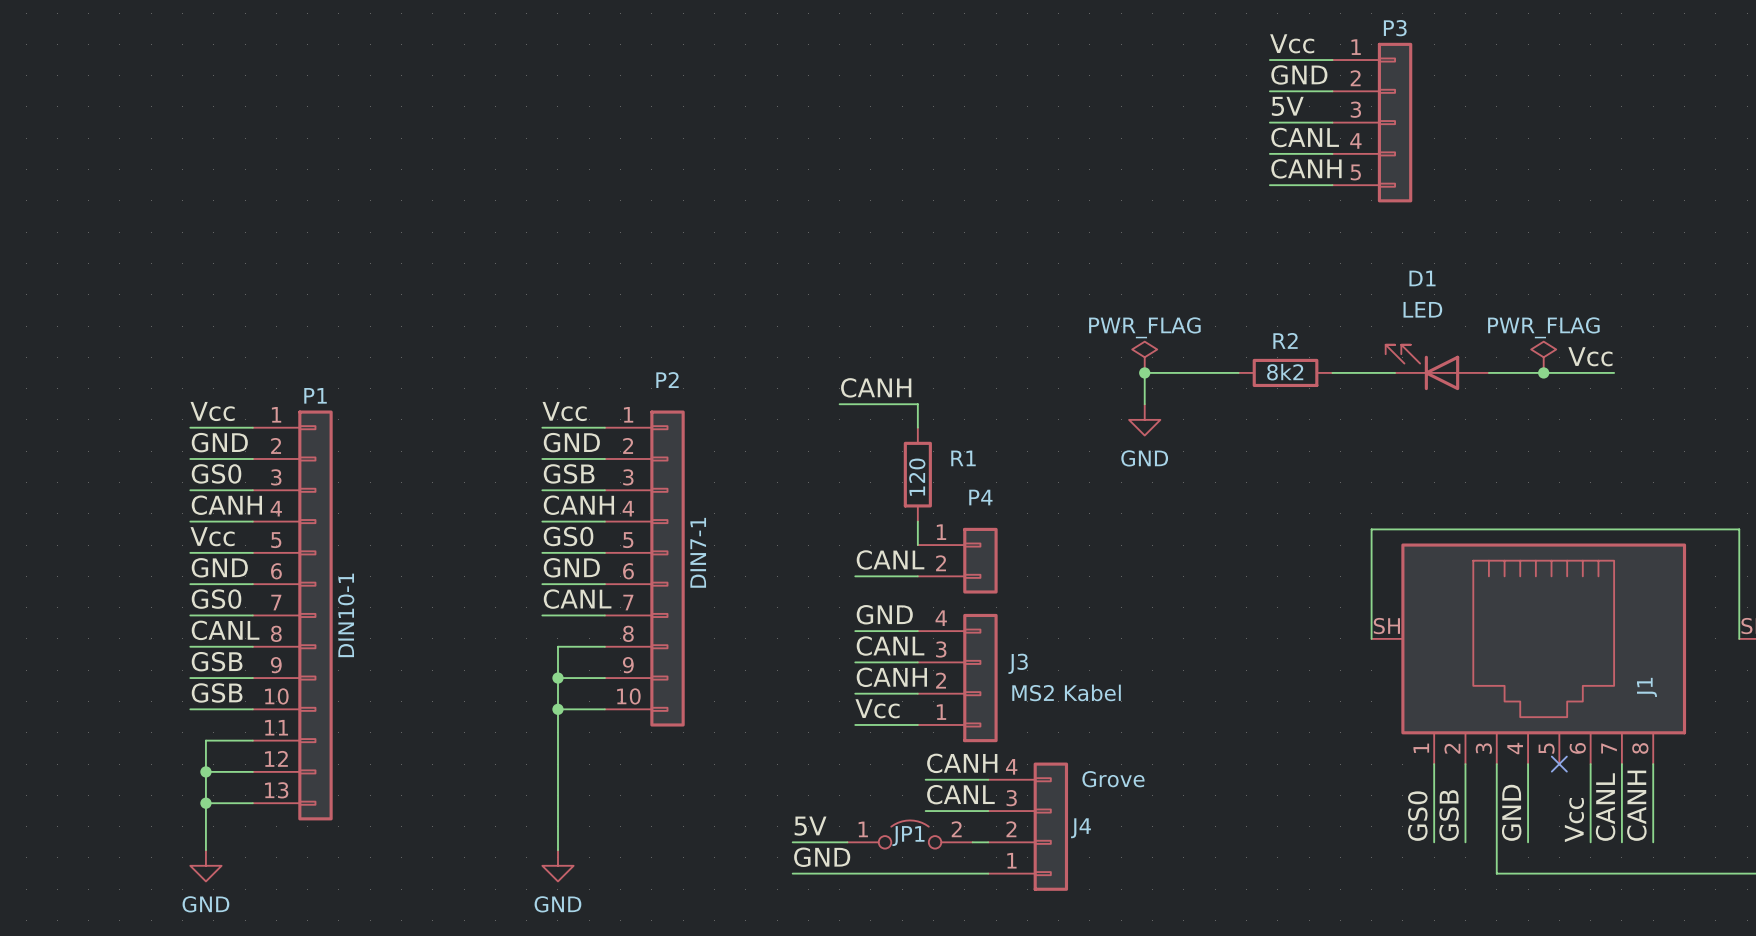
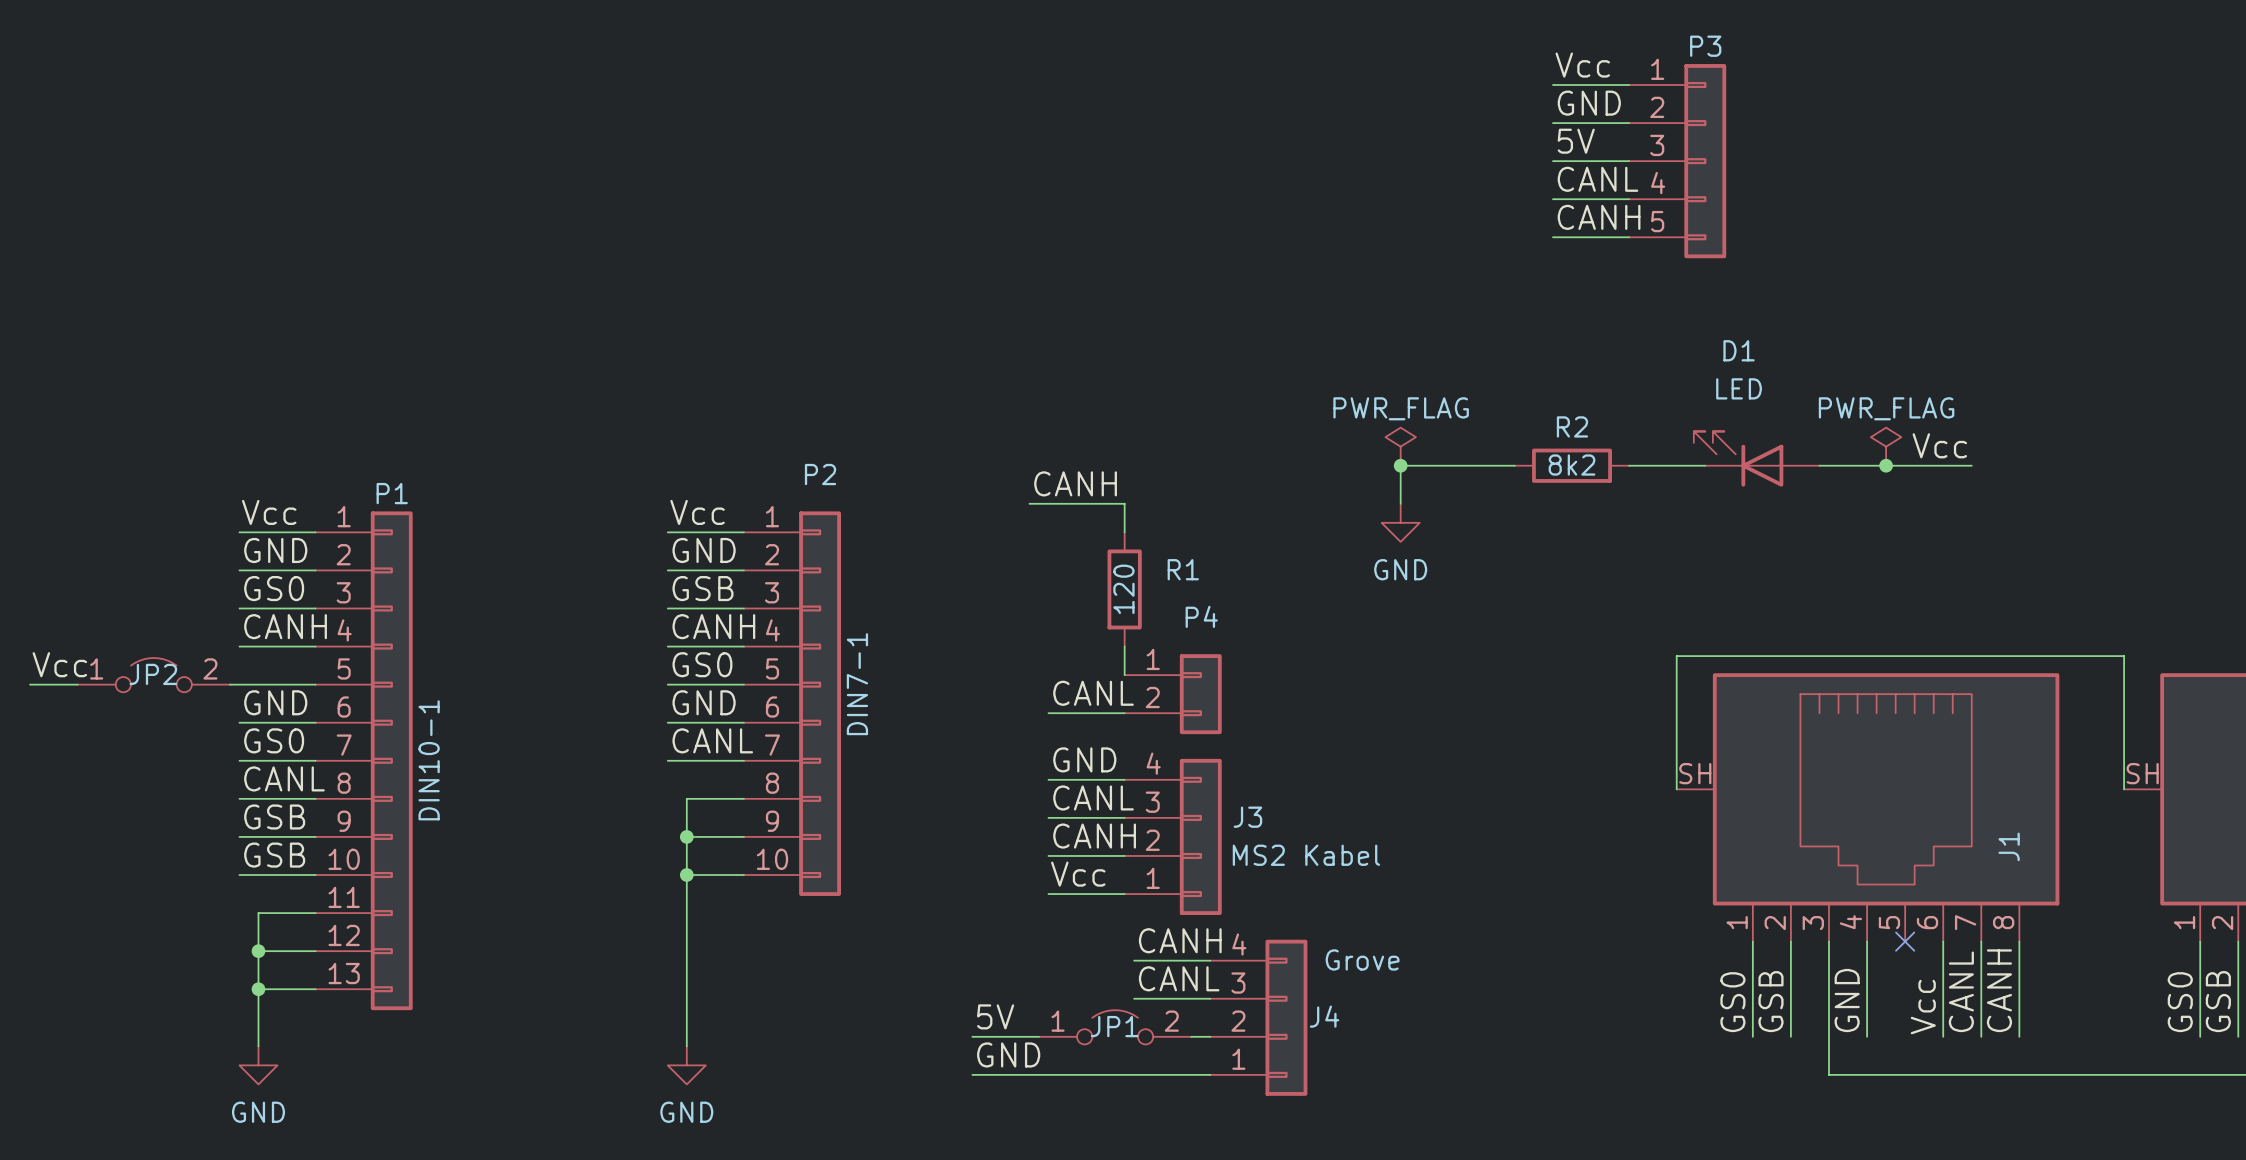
label position: Vcc (212, 536) -> Vcc (59, 664)
JP2: none -> (153, 675)
wire: none -> (30, 684) (77, 684)
wire: none -> (229, 684) (239, 684)

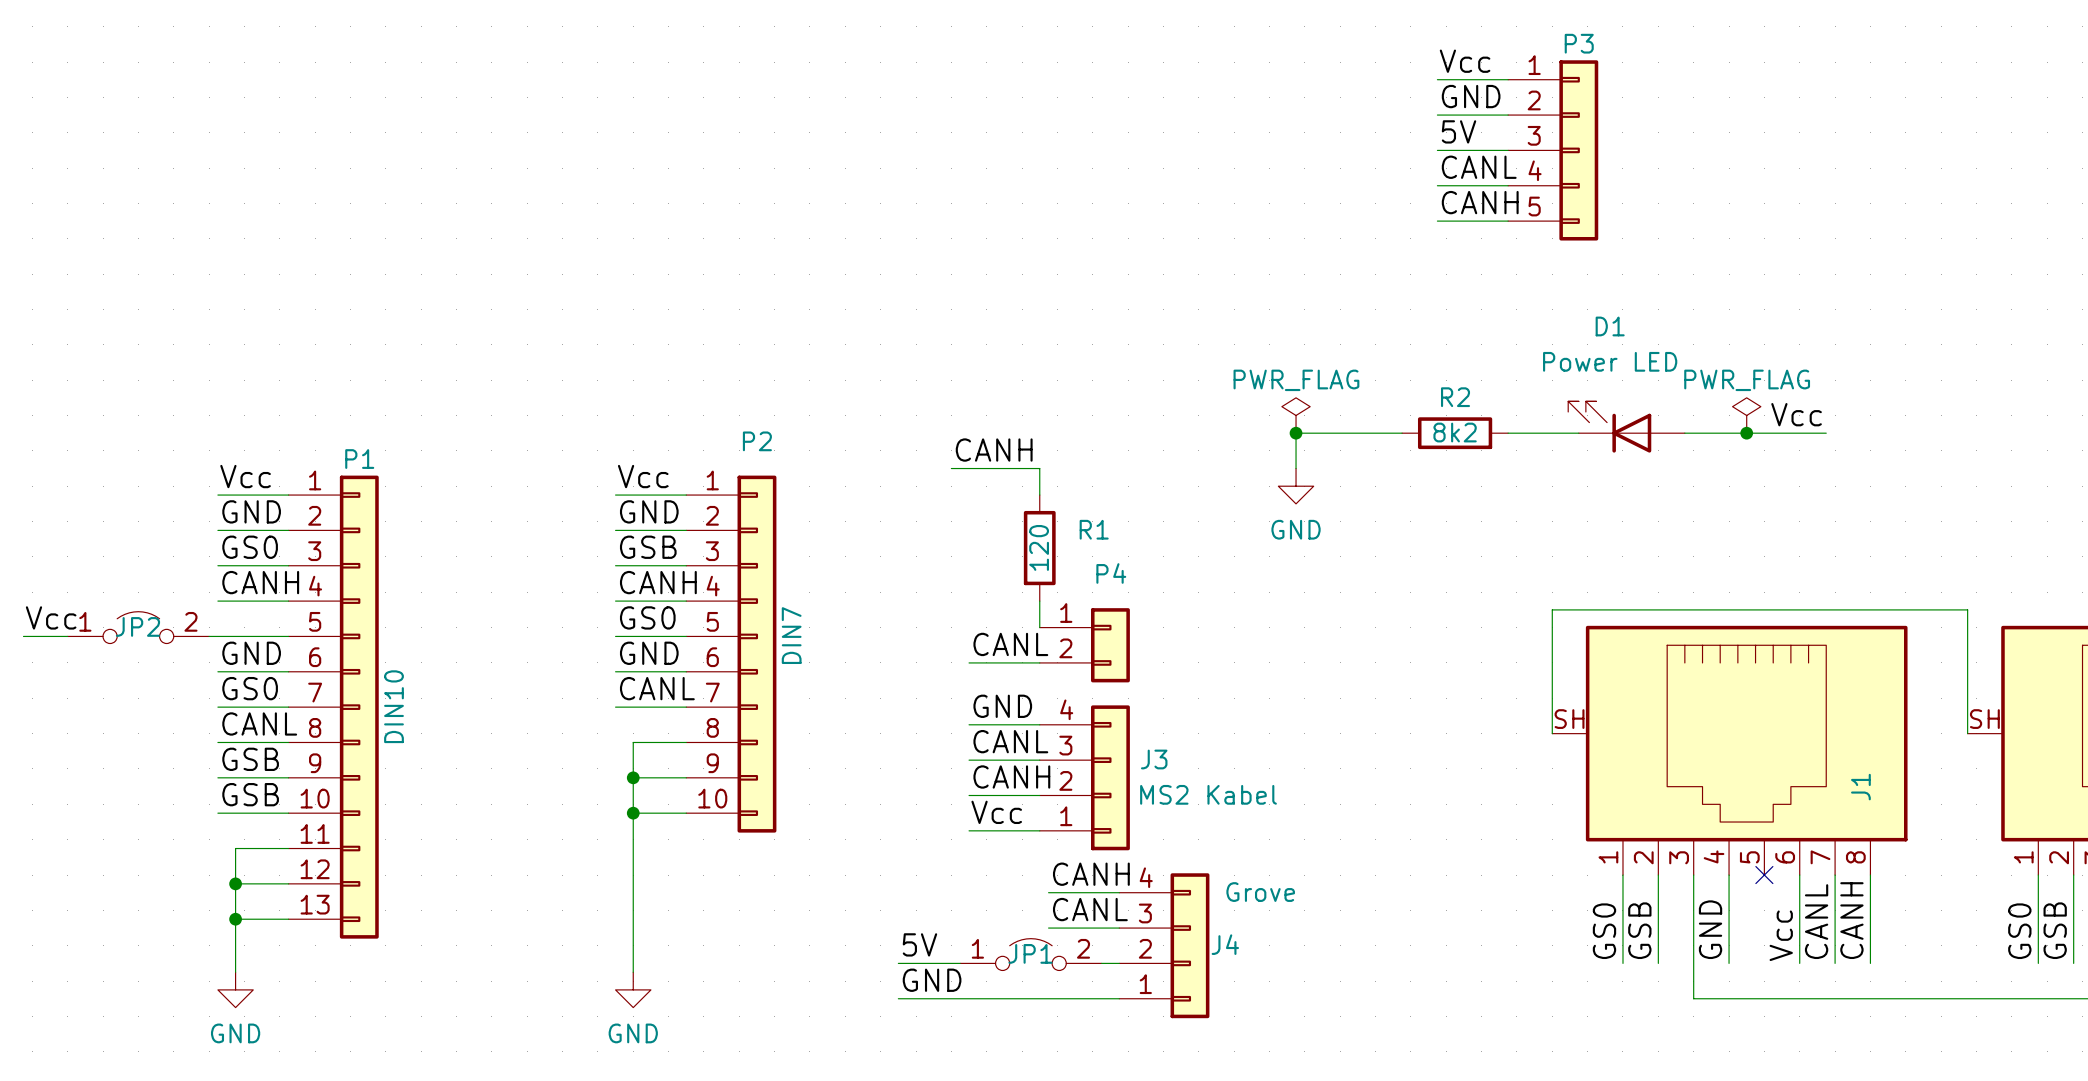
D1 value: LED (1739, 388) -> Power LED (1610, 361)
P2 value: DIN7-1 (857, 684) -> DIN7 (791, 635)
P1 value: DIN10-1 (429, 760) -> DIN10 (393, 706)

